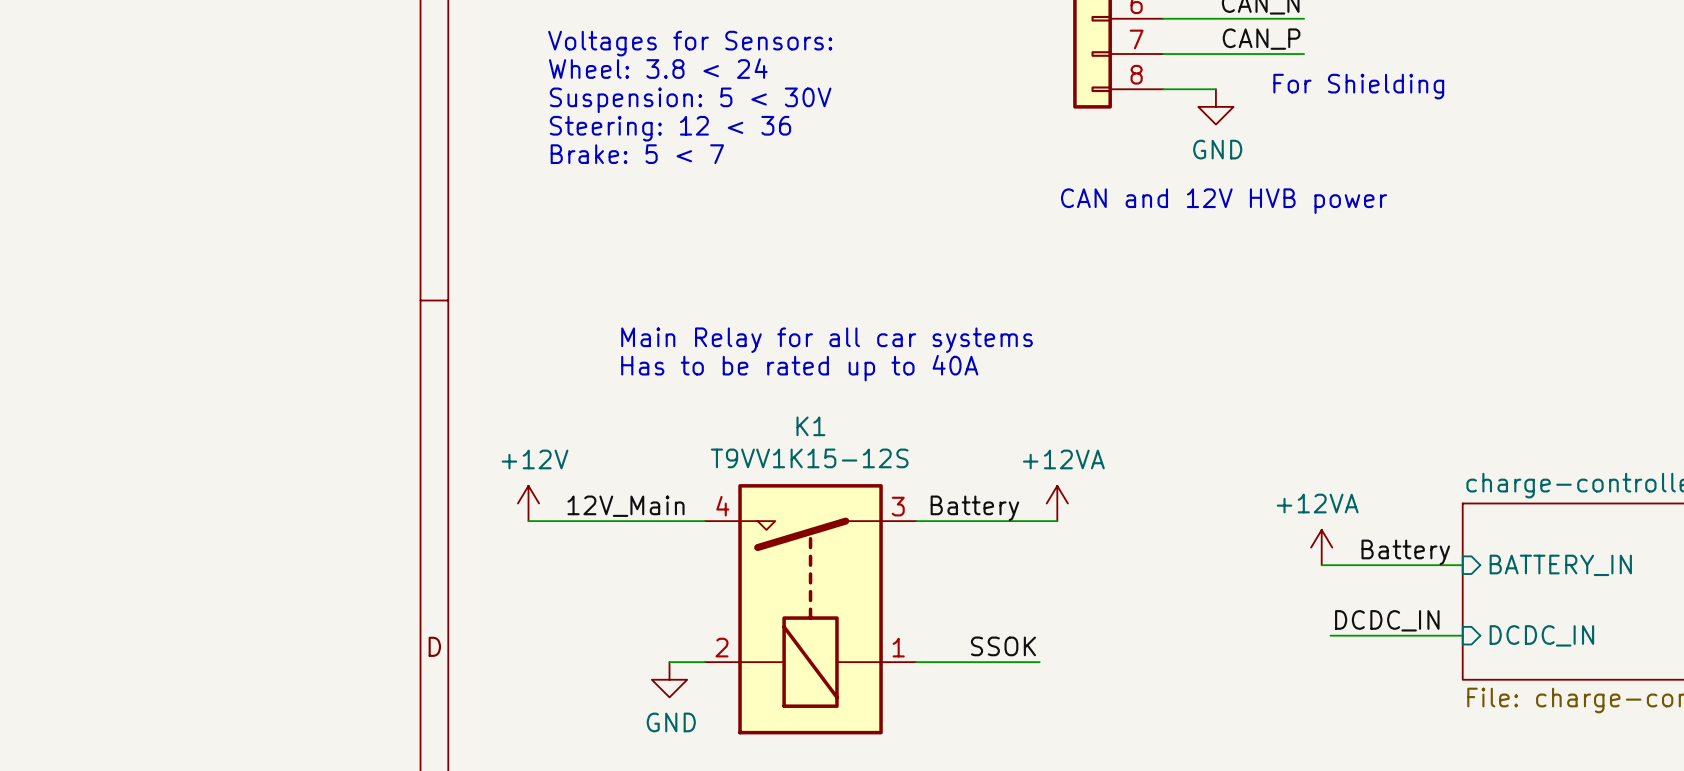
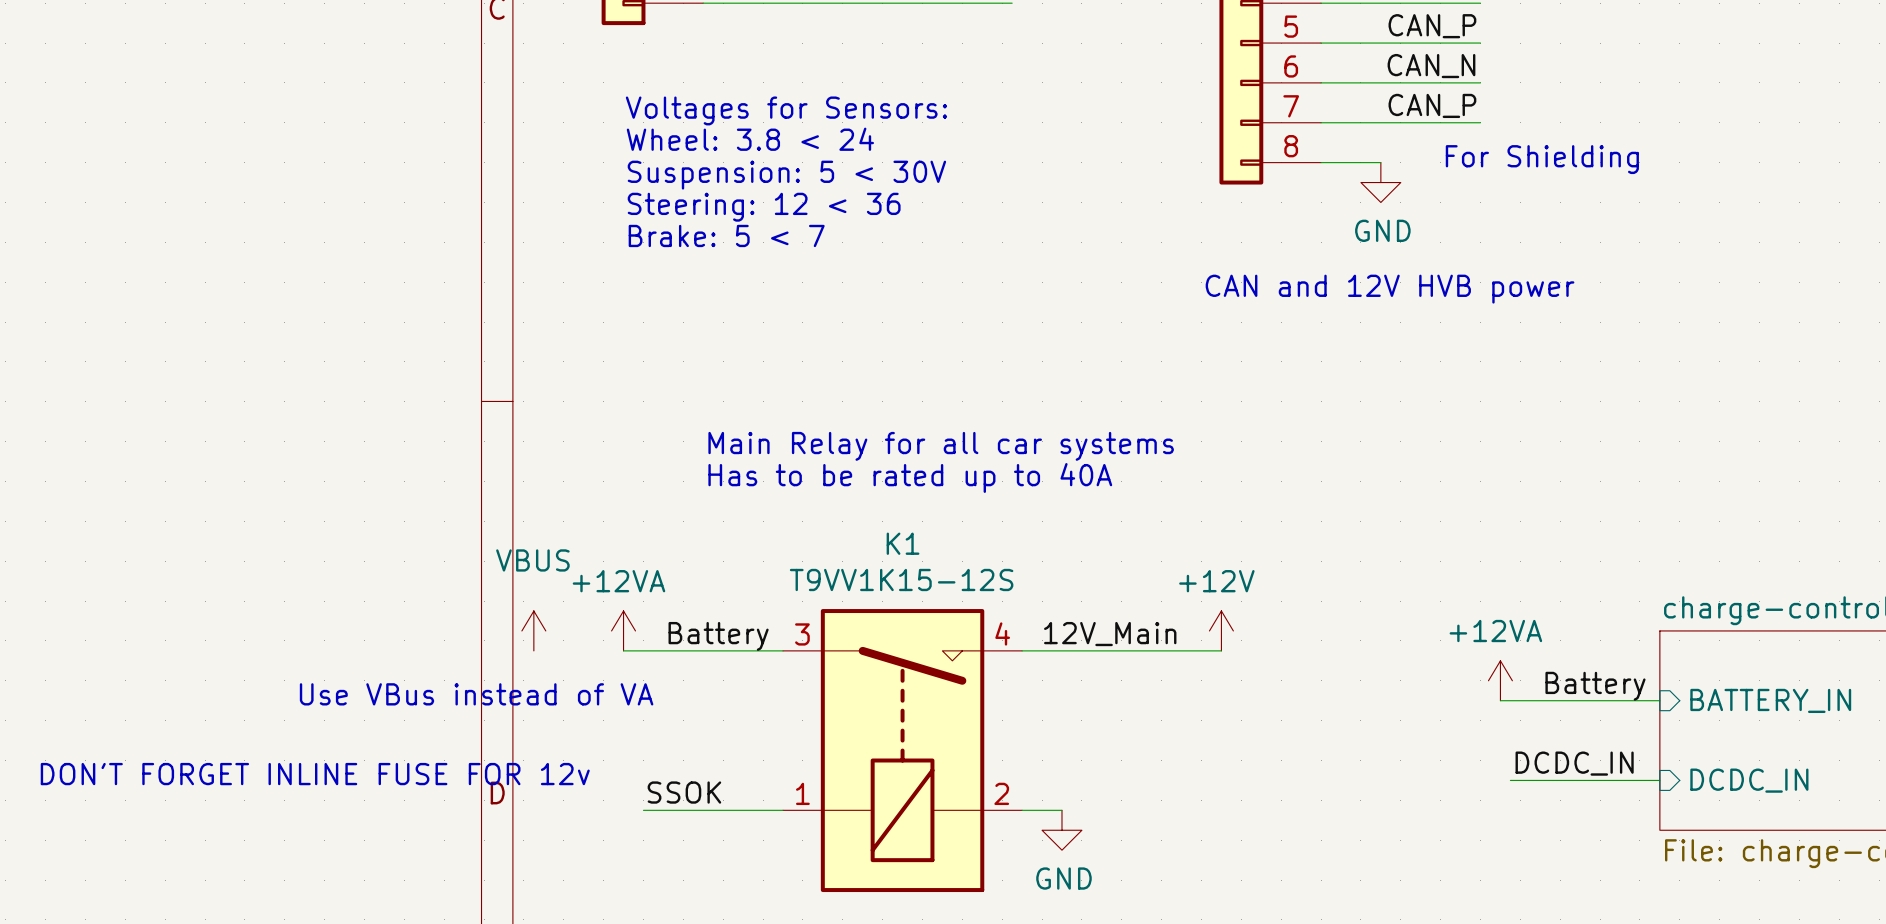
power symbol: none -> VBUS (533, 630)
power symbol: +12V (528, 503) -> none
power symbol: none -> +12VA (623, 630)
power symbol: +12VA (1057, 503) -> none
power symbol: none -> +12V (1221, 630)
label: 12V_Main (626, 506) -> none
label: none -> 12V_Main (1110, 634)
label: none -> Battery (718, 636)
label: Battery (974, 508) -> none
wire: (528, 521) (546, 521) -> none
wire: none -> (1201, 650) (1221, 650)
text: none -> Use VBus instead of VA (476, 694)
K1 flip: as is (810, 609) -> left-right (902, 750)
text: none -> DON'T FORGET INLINE FUSE FOR 12v (315, 774)
label: none -> SSOK (684, 792)
label: SSOK (1003, 646) -> none
wire: none -> (643, 810) (763, 810)
wire: (933, 662) (1039, 662) -> none
power symbol position: GND (669, 679) -> GND (1061, 830)

